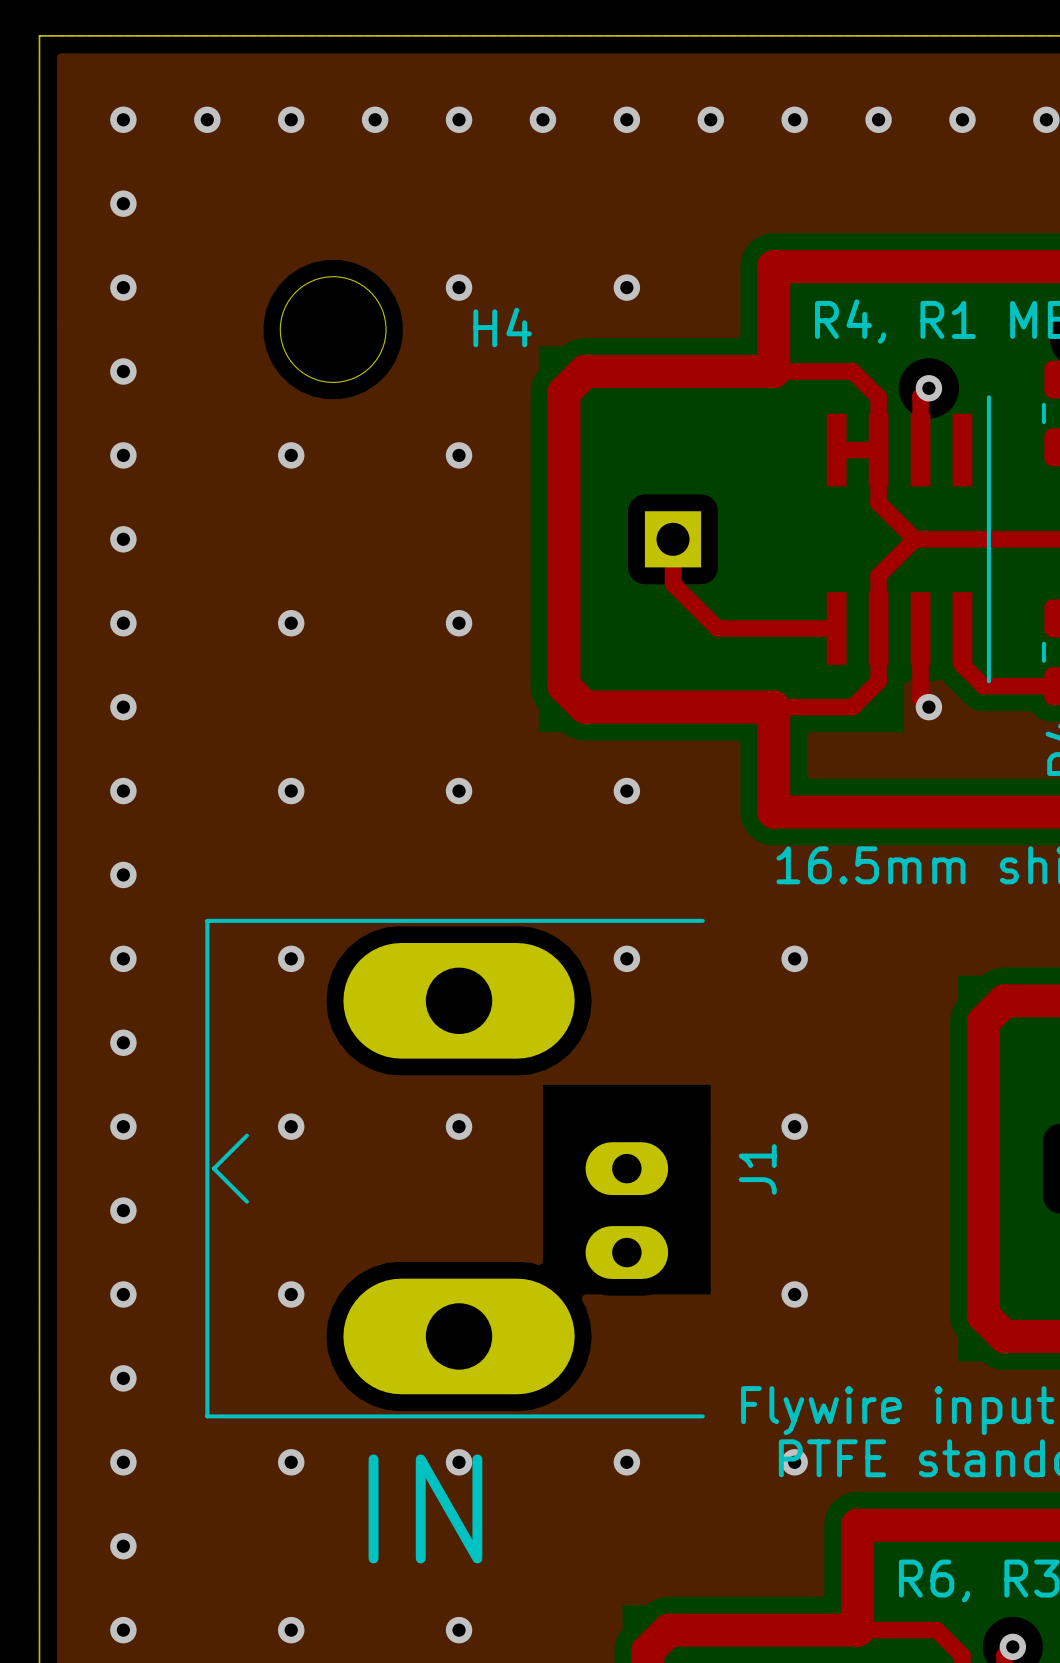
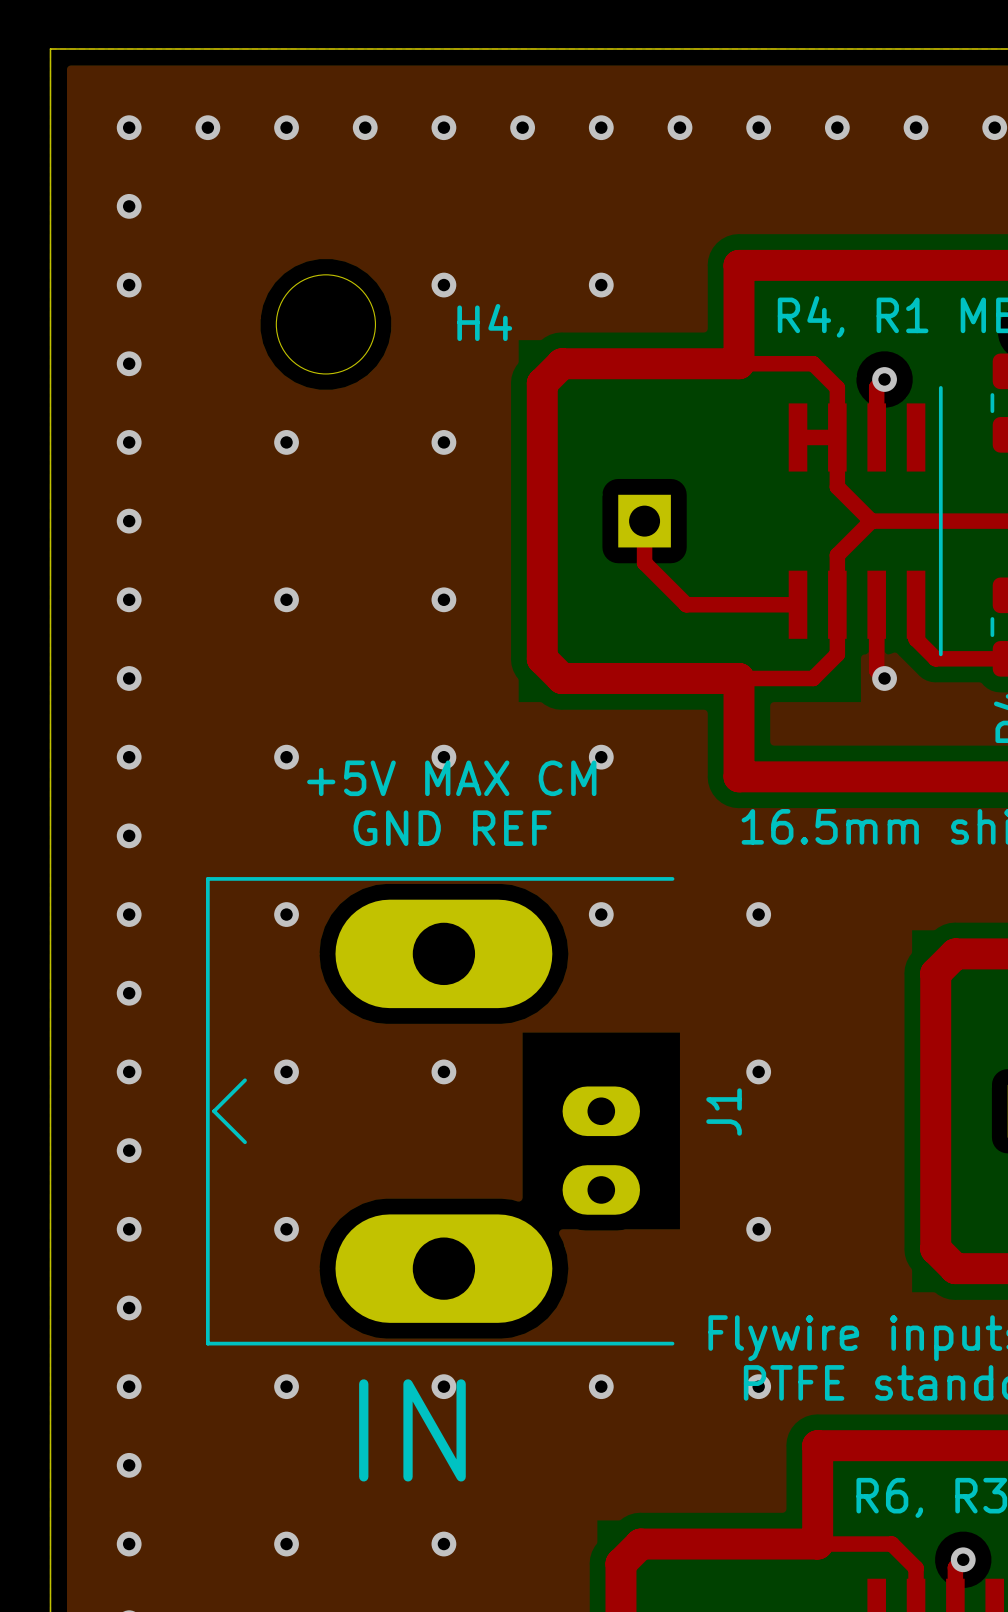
text: none -> +5V MAX CM (451, 778)
text: none -> GND REF (452, 828)

